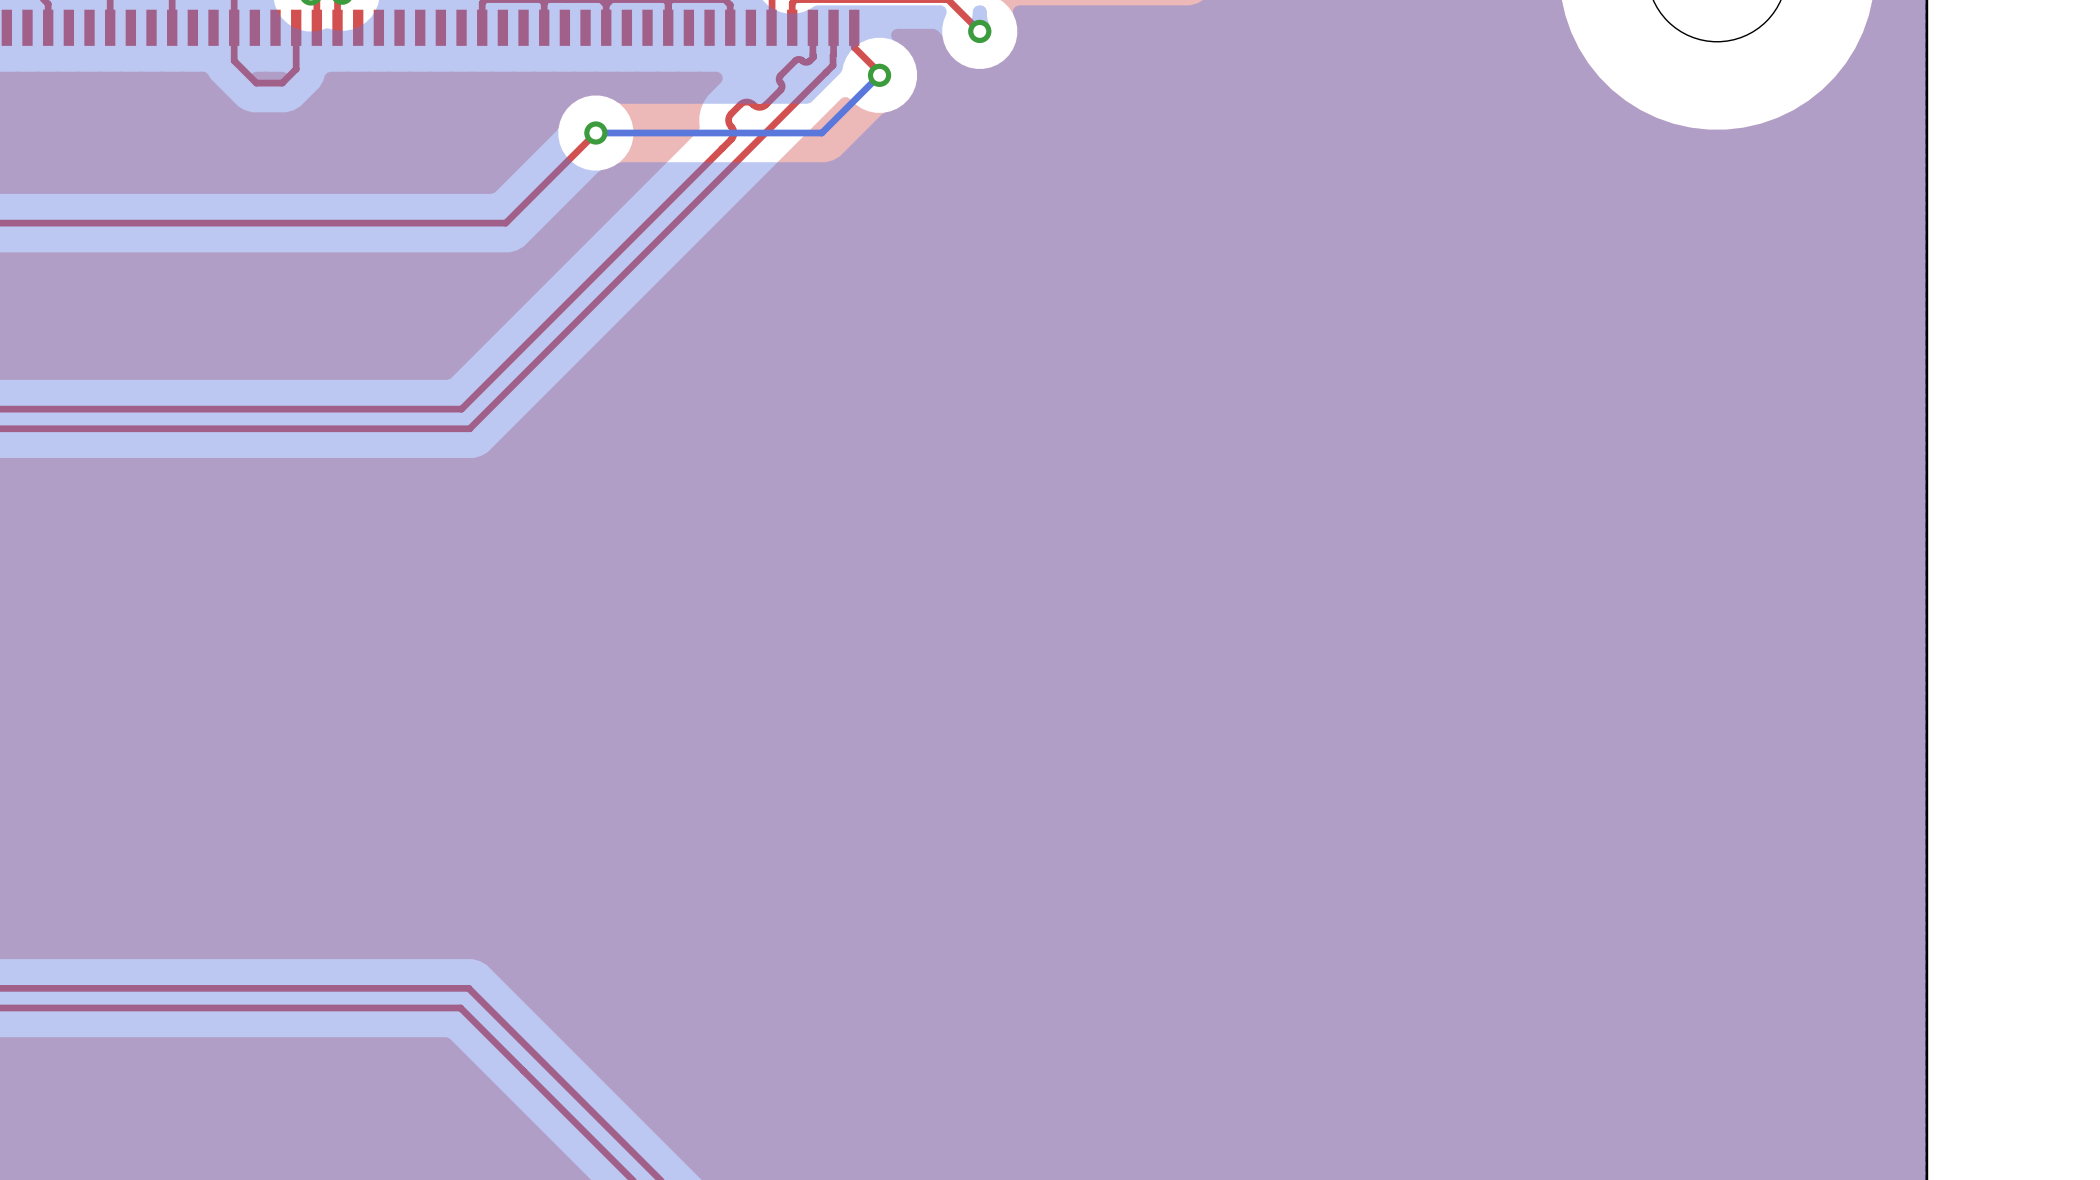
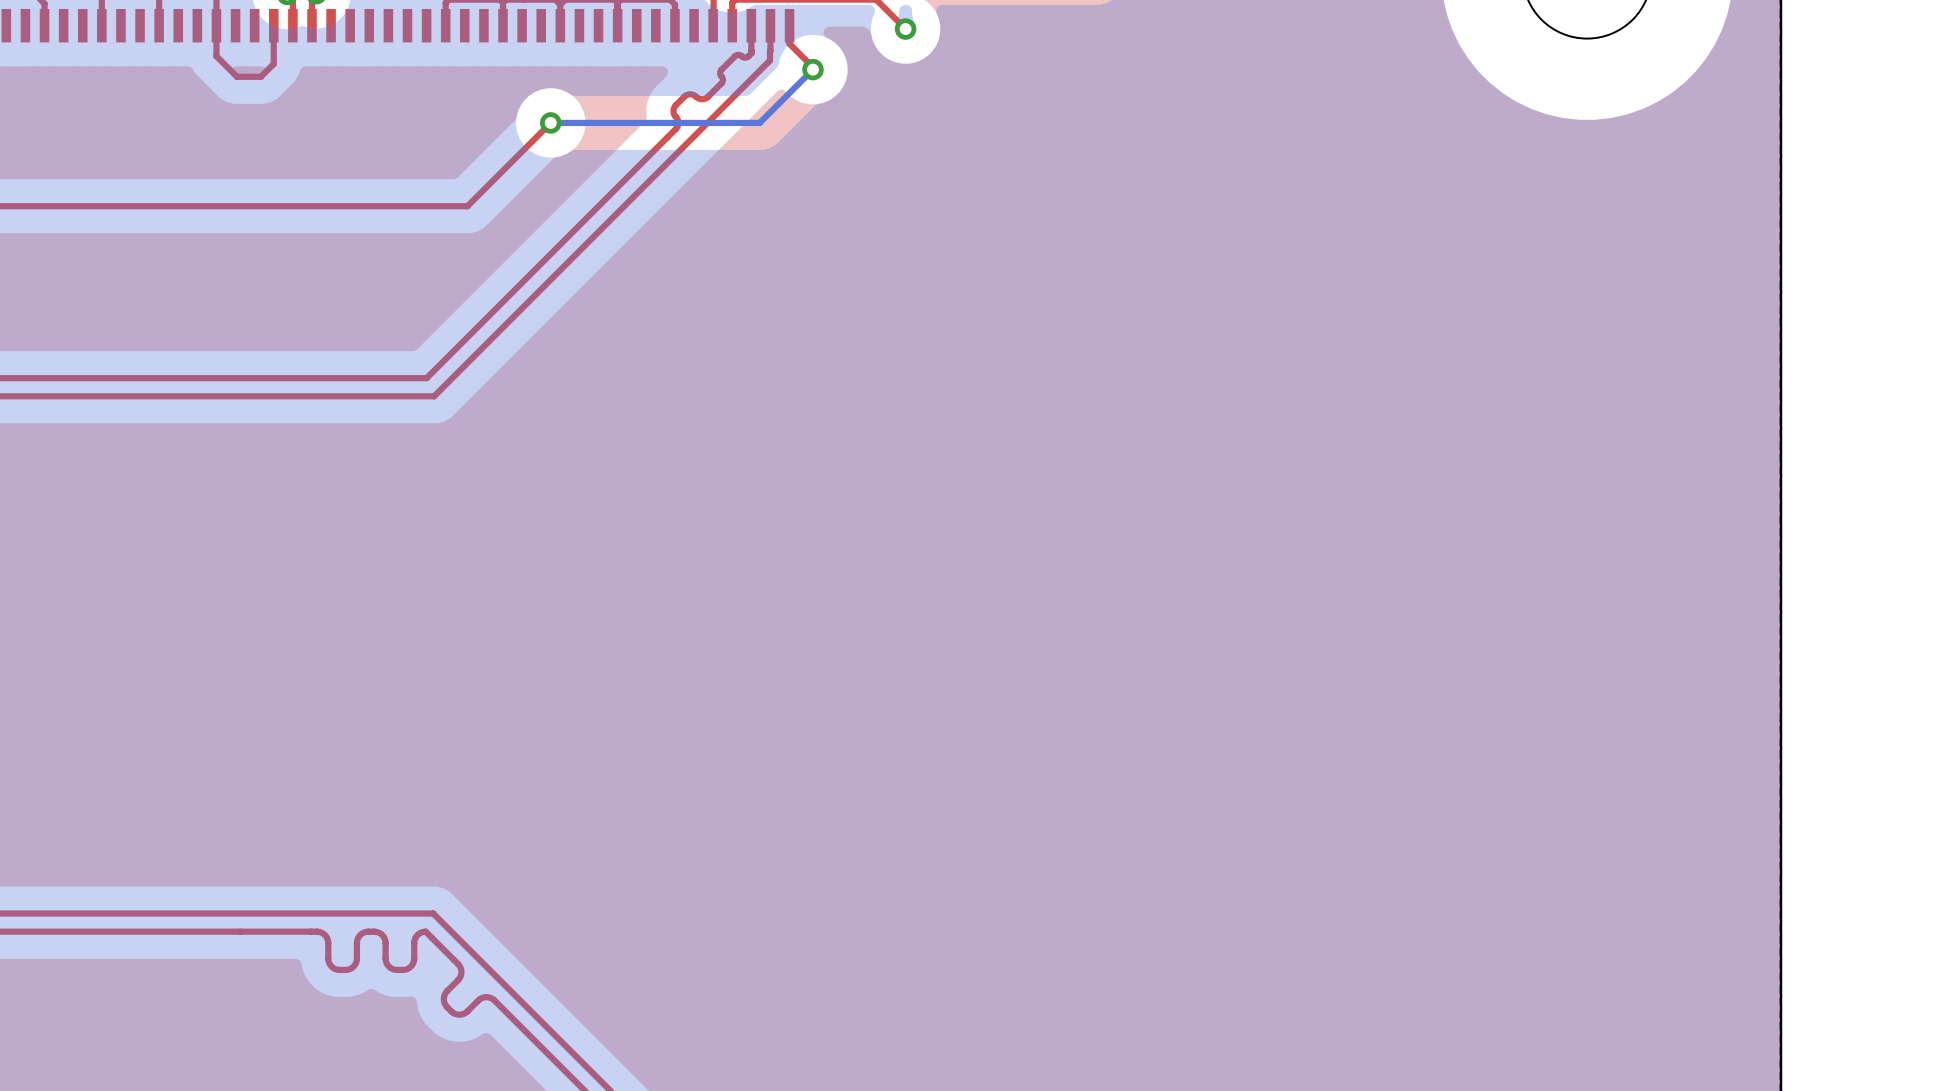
top track: (398, 1007) (342, 1007) -> (368, 931) (362, 933) (357, 939) (355, 964) (345, 969) (335, 969) (330, 965) (328, 959) (327, 939) (322, 933) (316, 931)
top track: (460, 1007) (404, 1007) -> (425, 931) (415, 937) (413, 962) (409, 967) (402, 969) (393, 969) (388, 965) (385, 959) (384, 939) (380, 933) (374, 931)
top track: (495, 1042) (535, 1082) -> (458, 964) (461, 969) (460, 977) (446, 992) (443, 997) (444, 1004) (451, 1011) (456, 1014) (462, 1014) (482, 998) (489, 997) (494, 1000)

